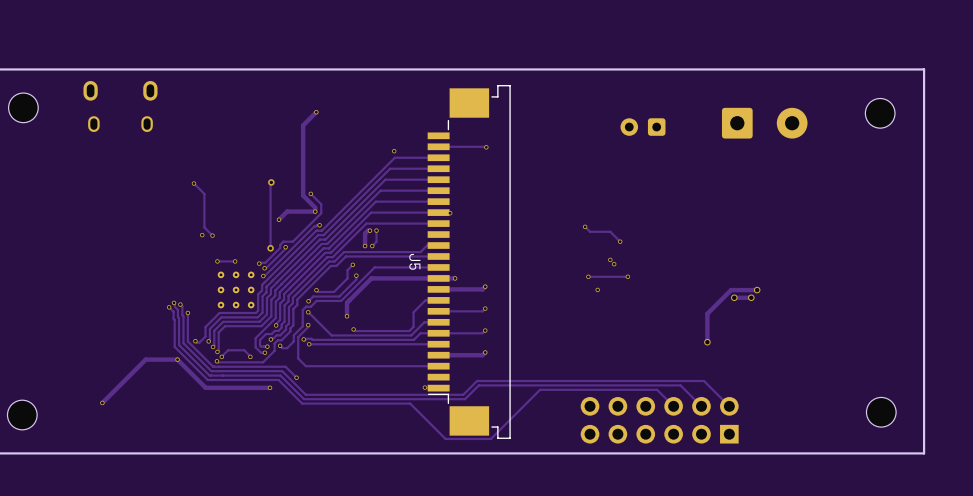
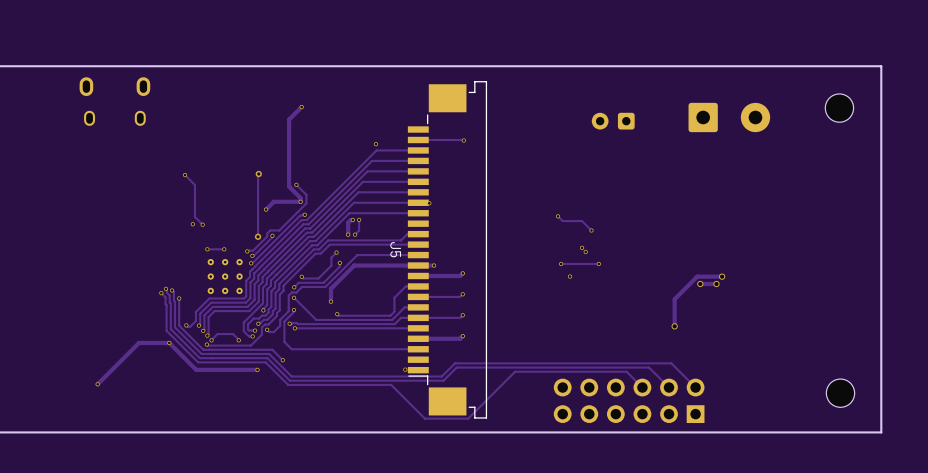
part: (23, 107) -> none
part: (22, 415) -> none

